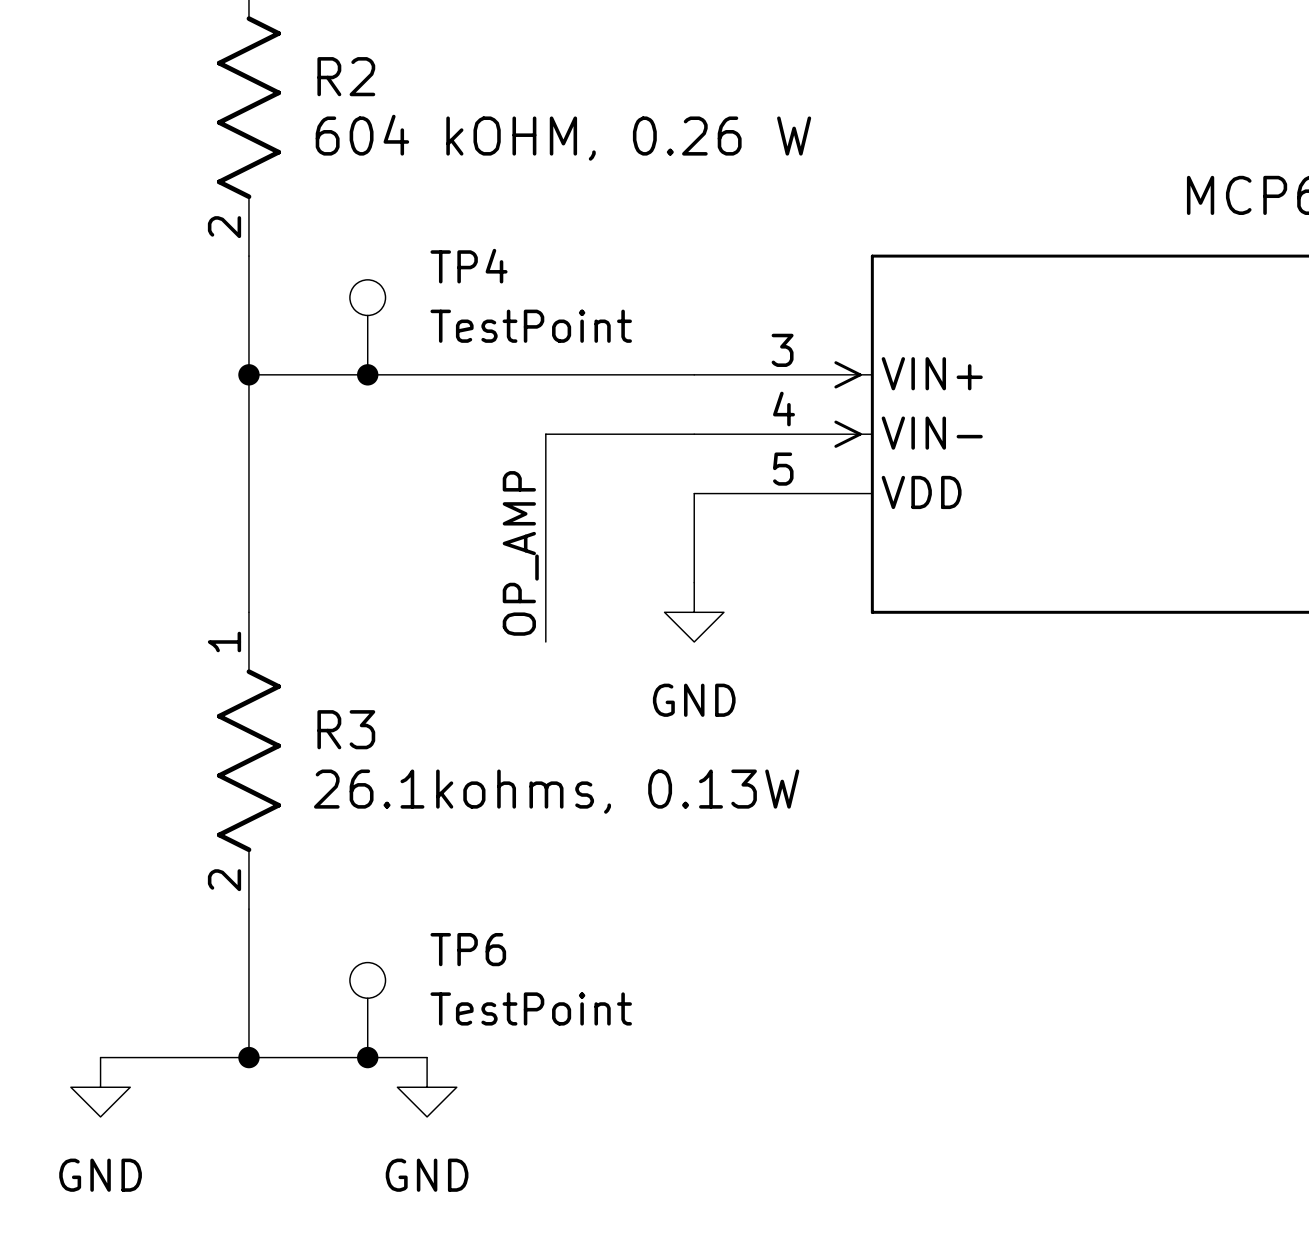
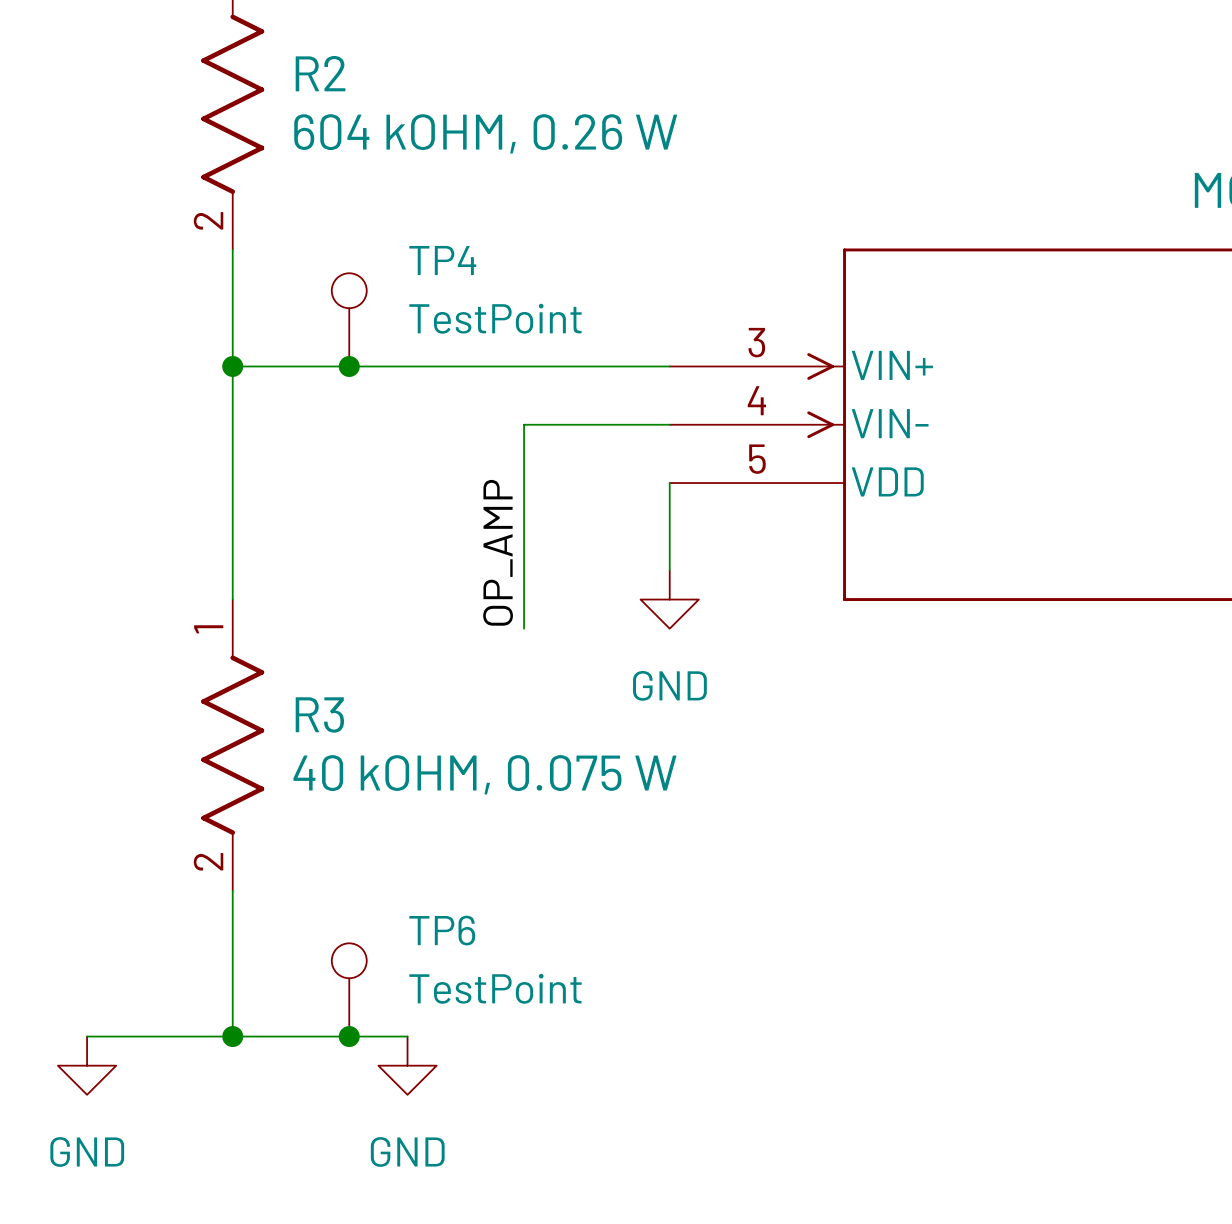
R3 value: 26.1kohms, 0.13W (556, 791) -> 40 kOHM, 0.075 W (484, 774)

